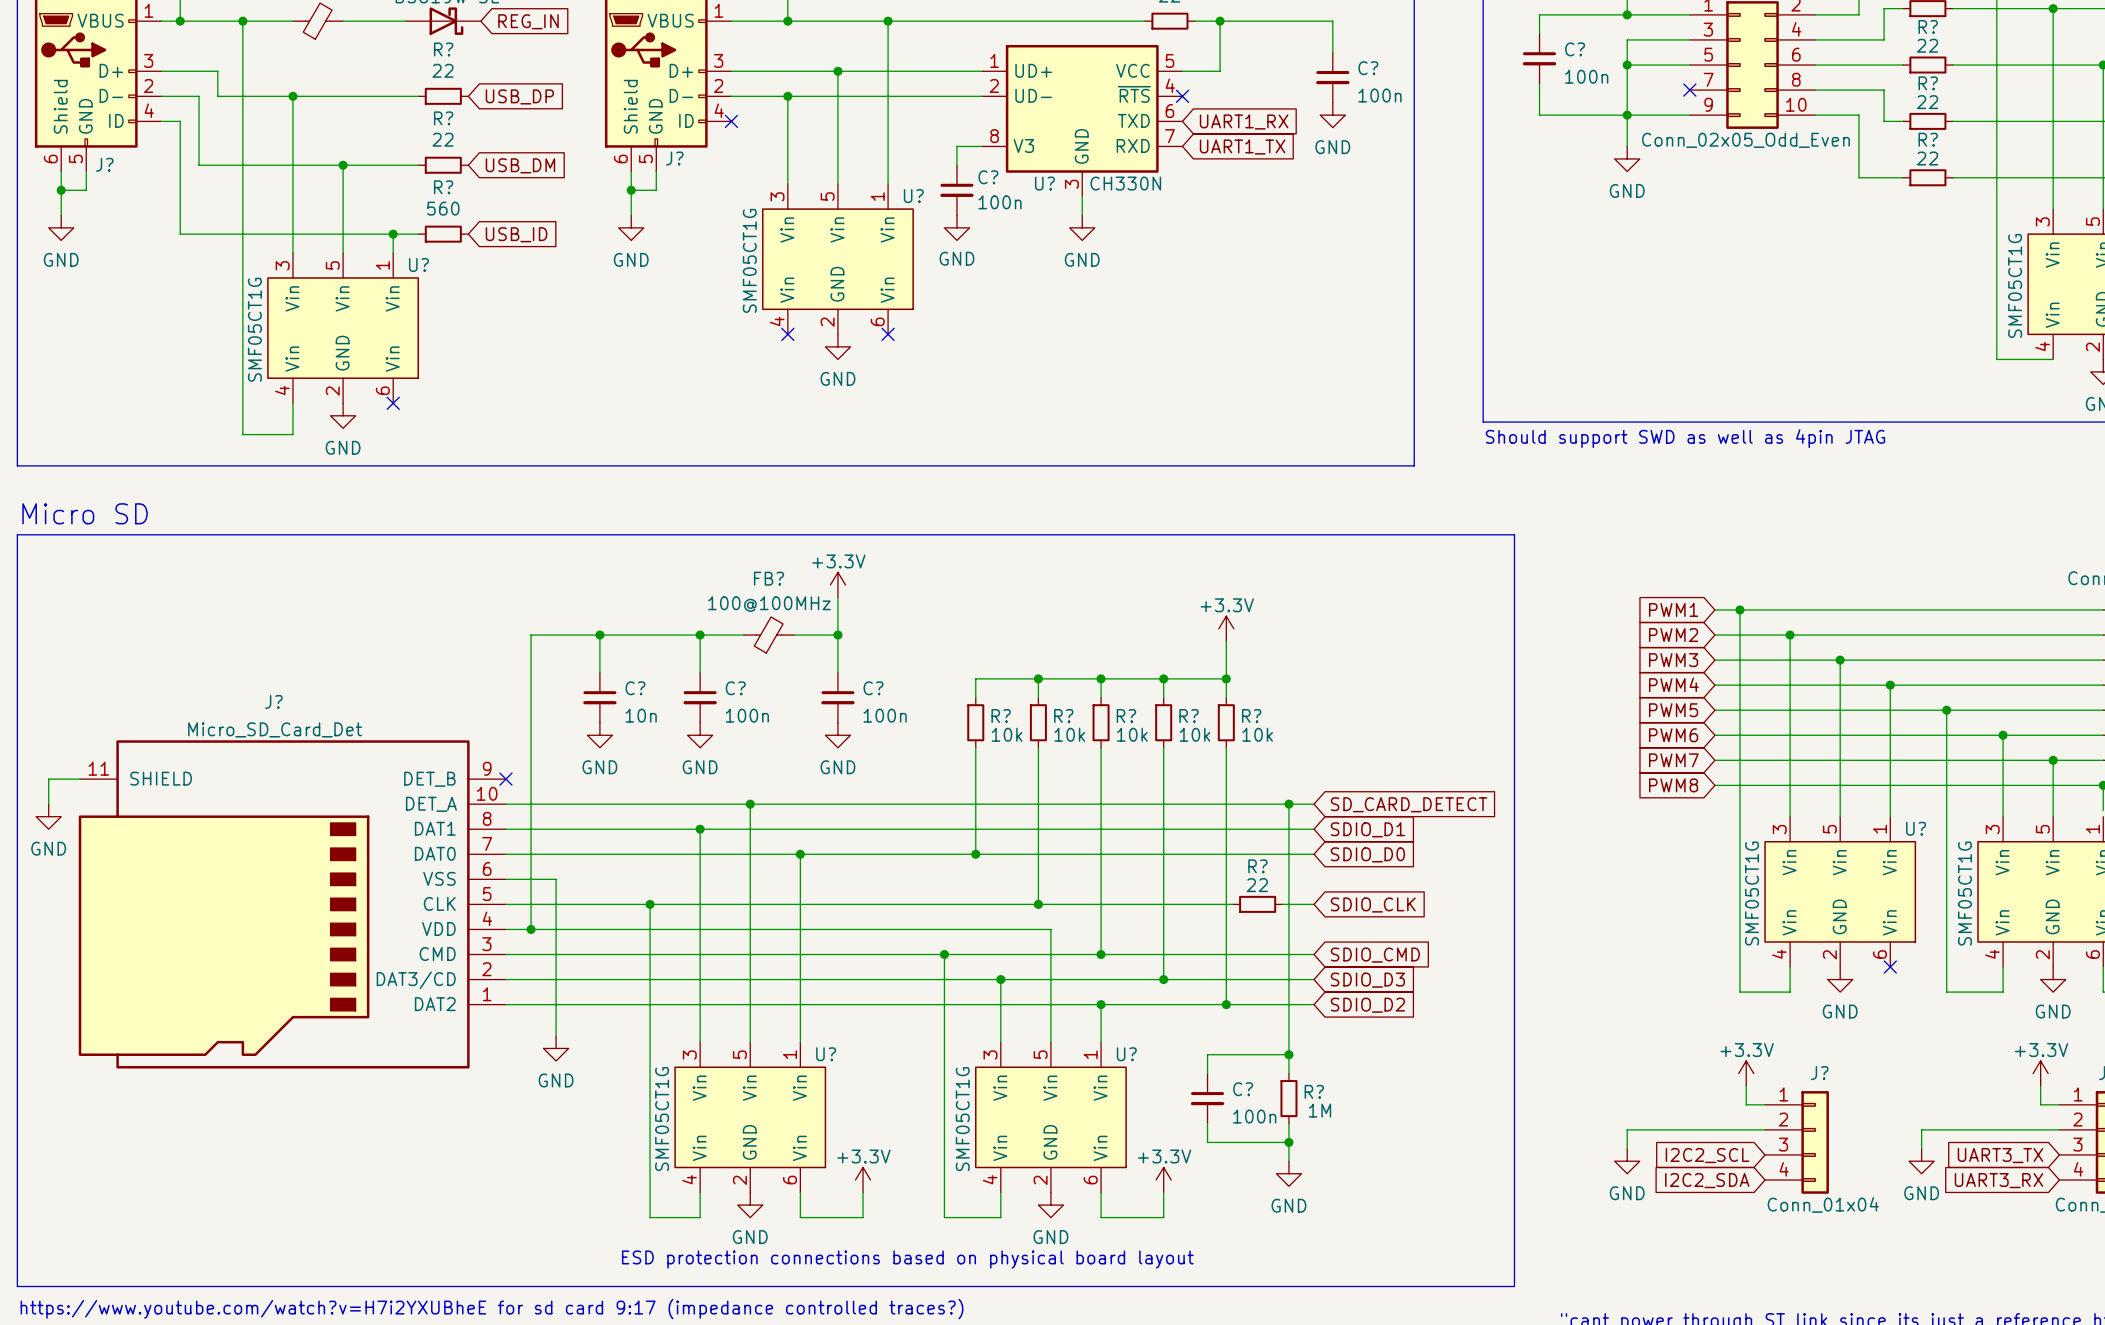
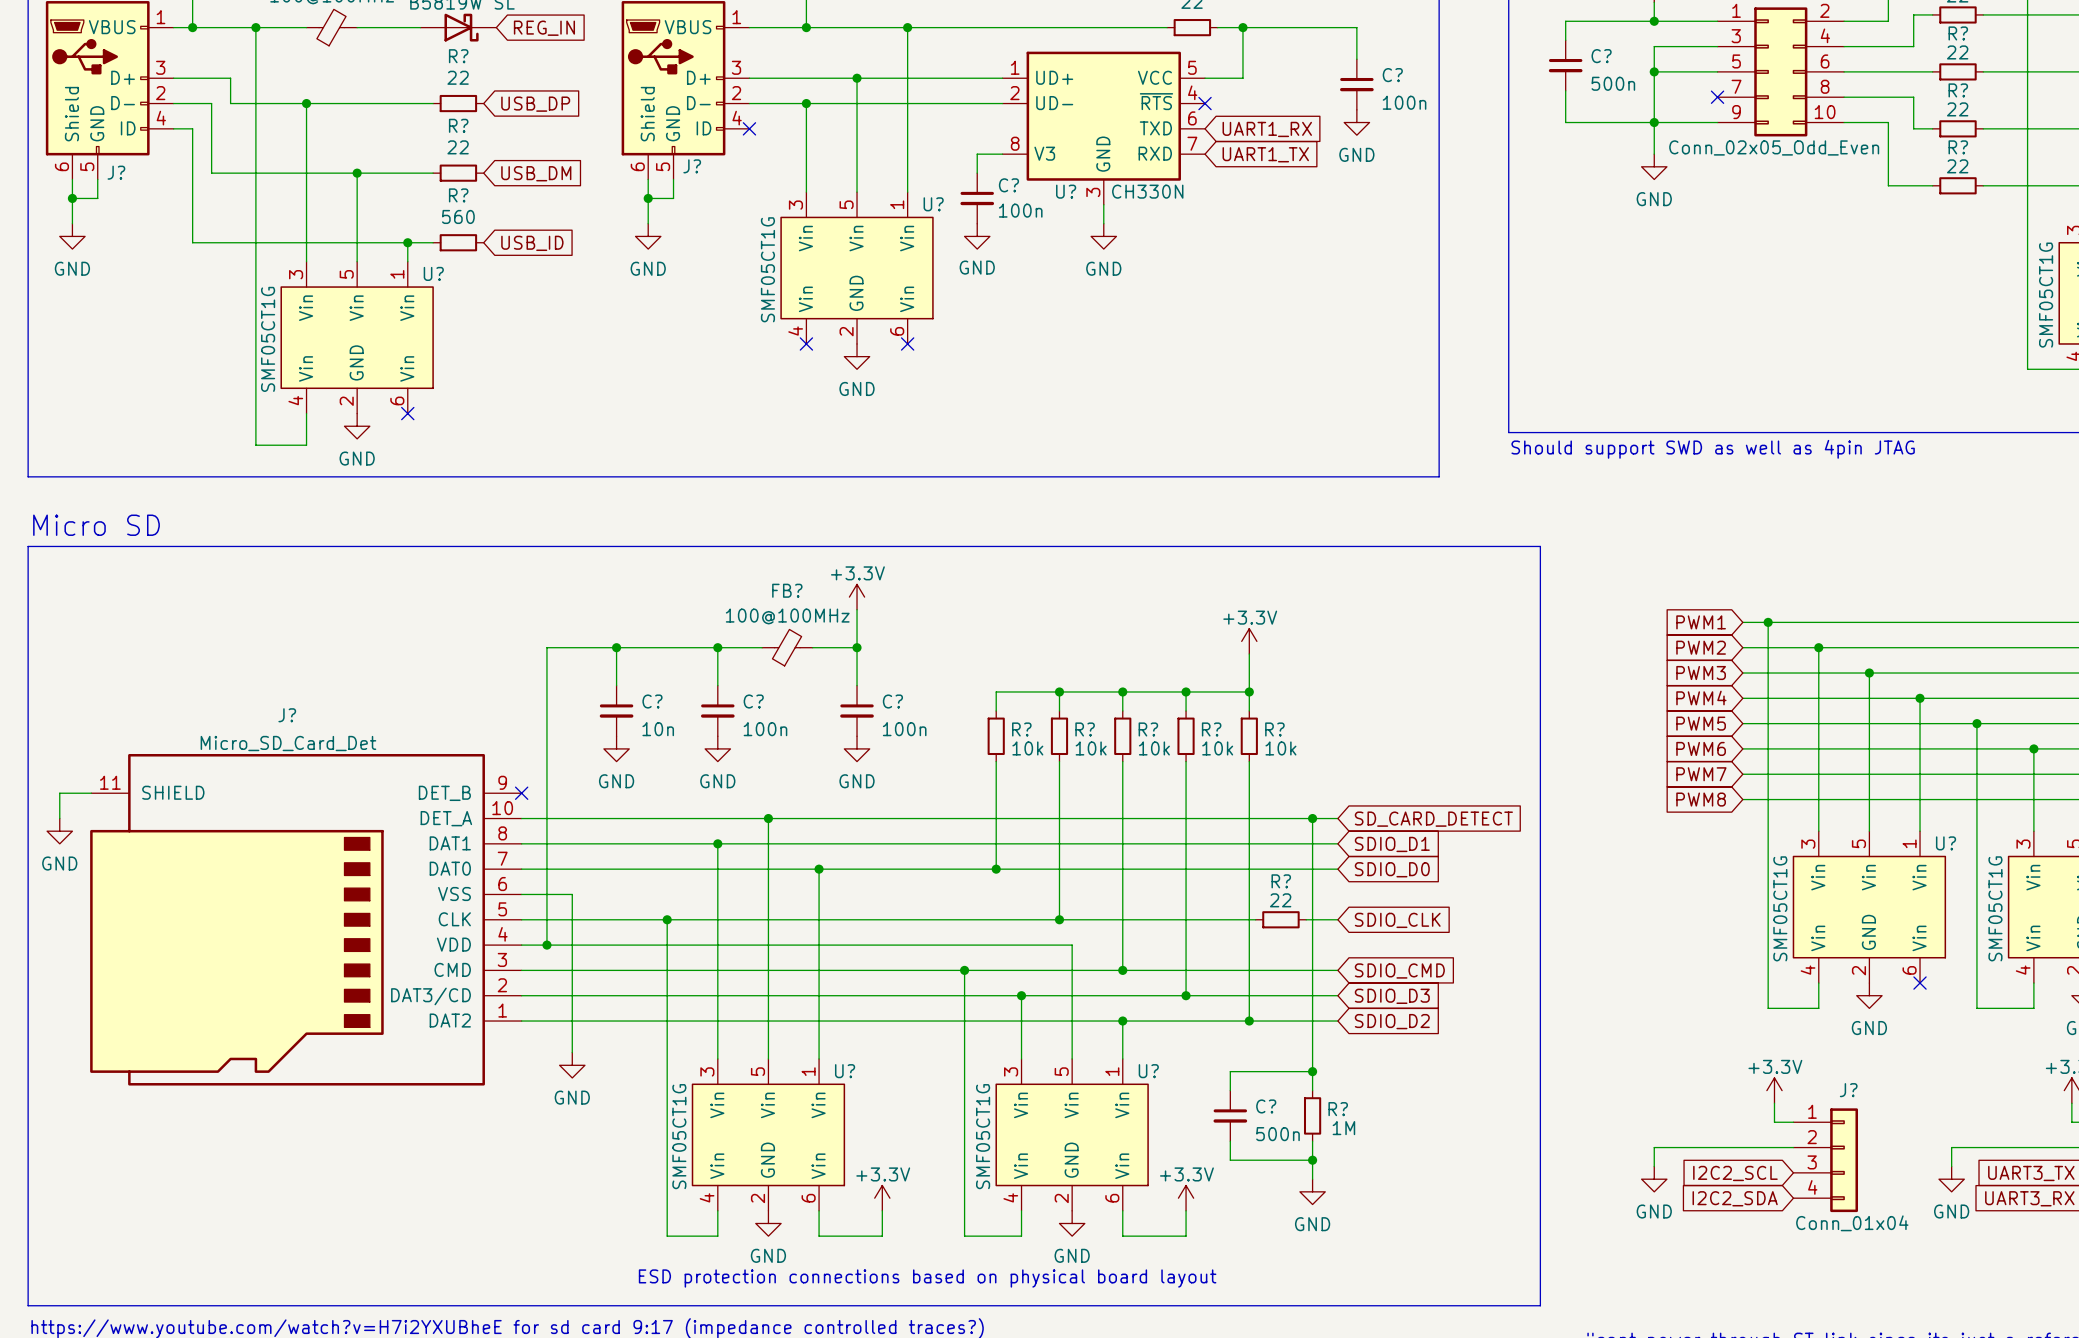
C? value: 100n (1586, 76) -> 500n (1613, 83)
C? value: 100n (1254, 1116) -> 500n (1277, 1134)

